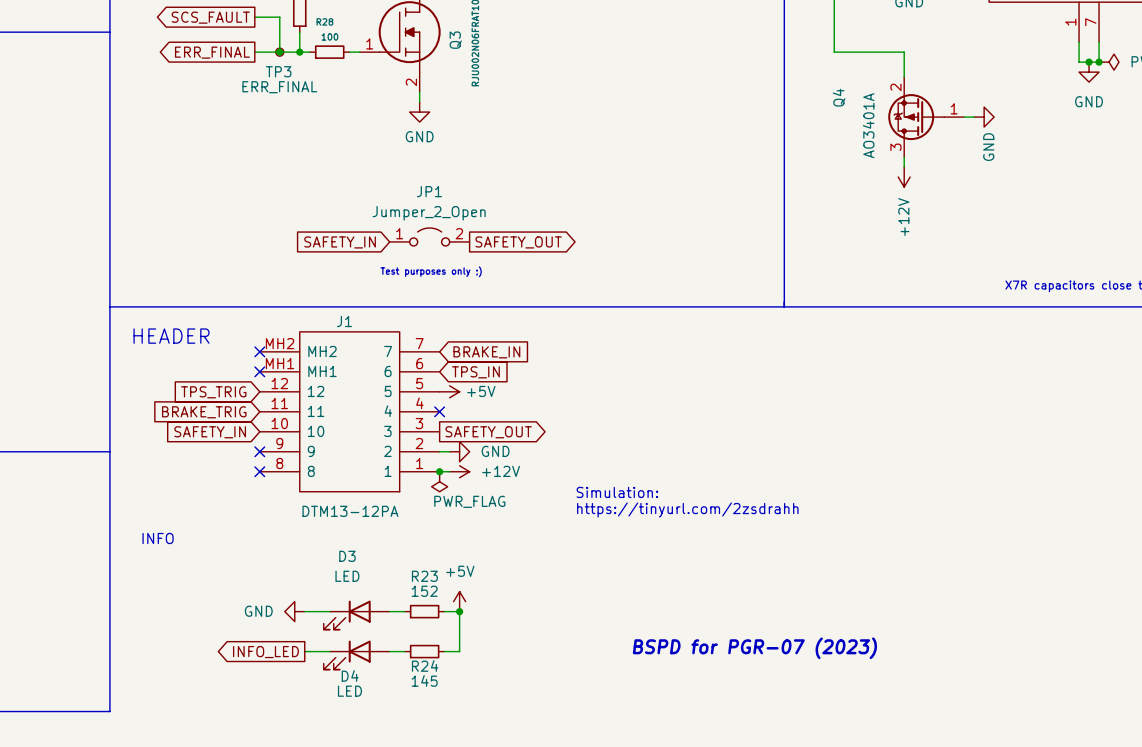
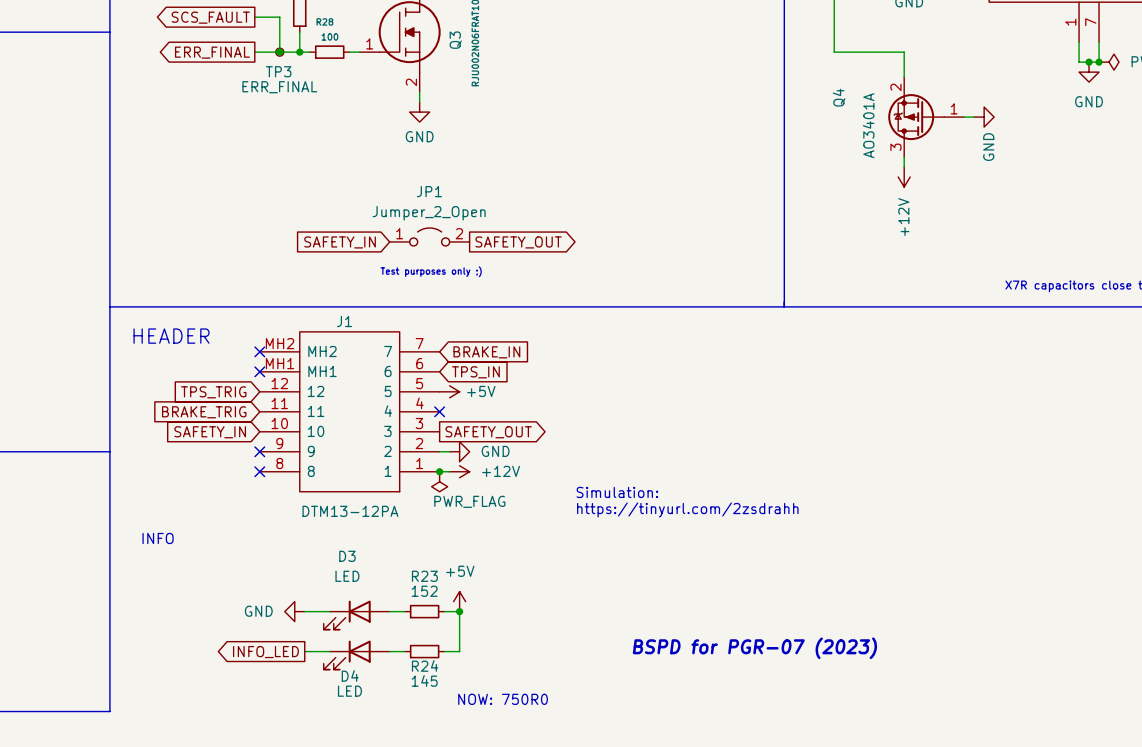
text: none -> NOW: 750R0 (503, 699)

